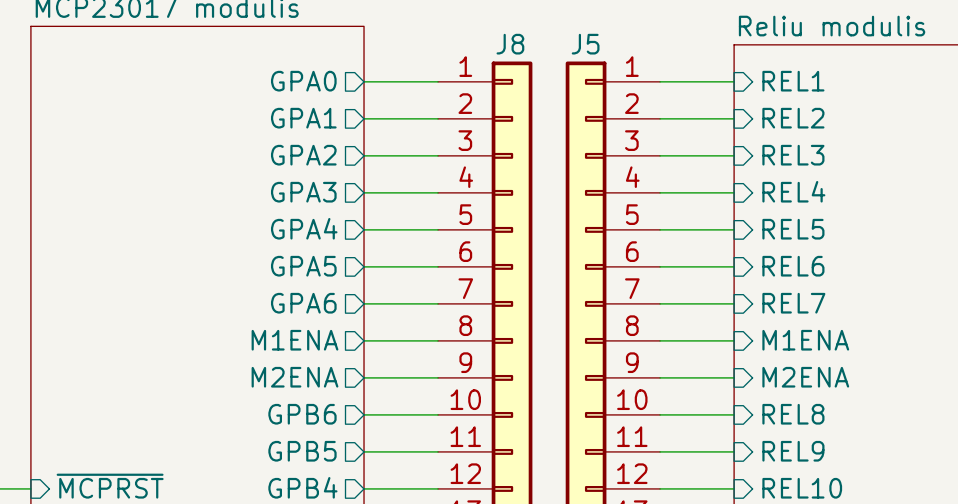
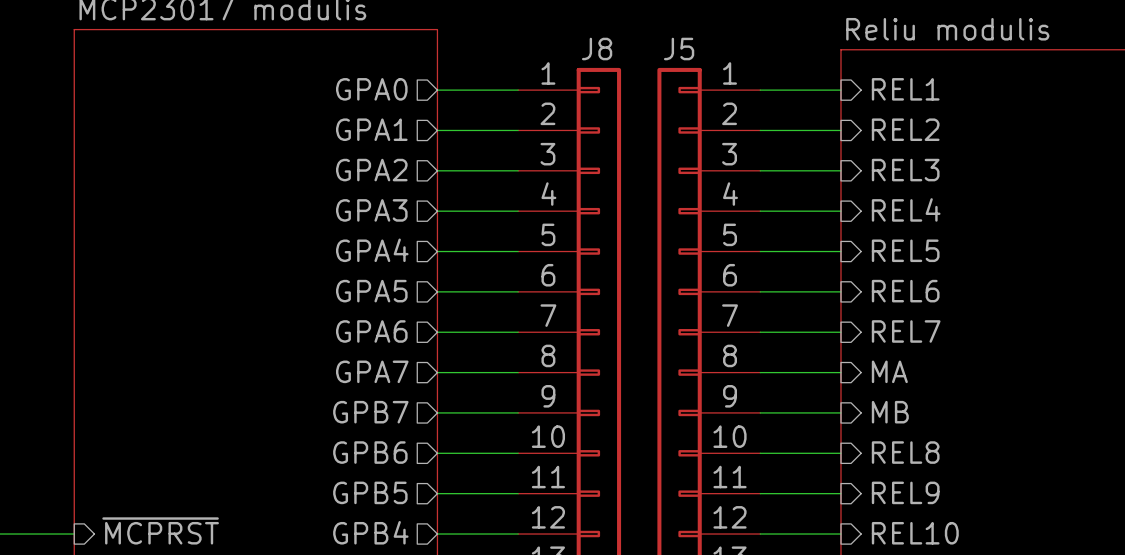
sheet pin: M1ENA (294, 340) -> GPA7 (372, 371)
sheet pin: M1ENA (805, 340) -> MA (889, 371)
sheet pin: M2ENA (294, 377) -> GPB7 (370, 412)
sheet pin: M2ENA (805, 377) -> MB (890, 412)

